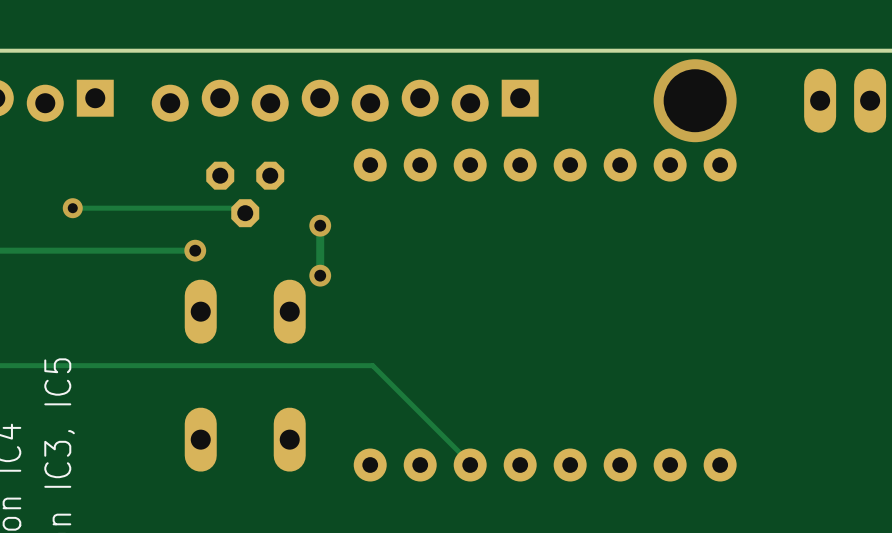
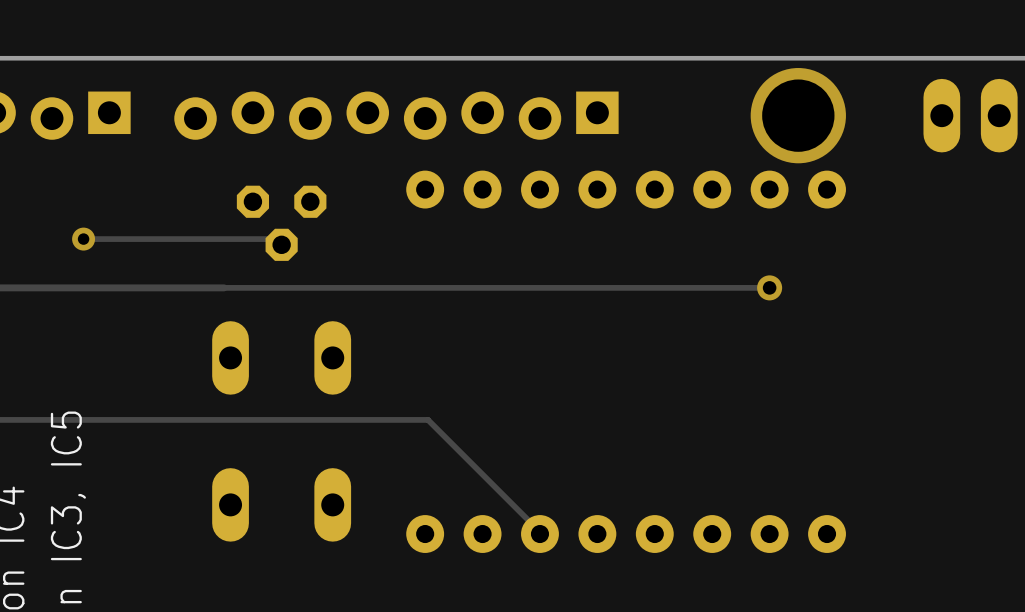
track: (320, 225) (320, 275) -> none
via: (320, 225) -> none
via: (195, 250) -> none
track: none -> (769, 287) (224, 287)
via: none -> (769, 287)
via: (320, 275) -> none

